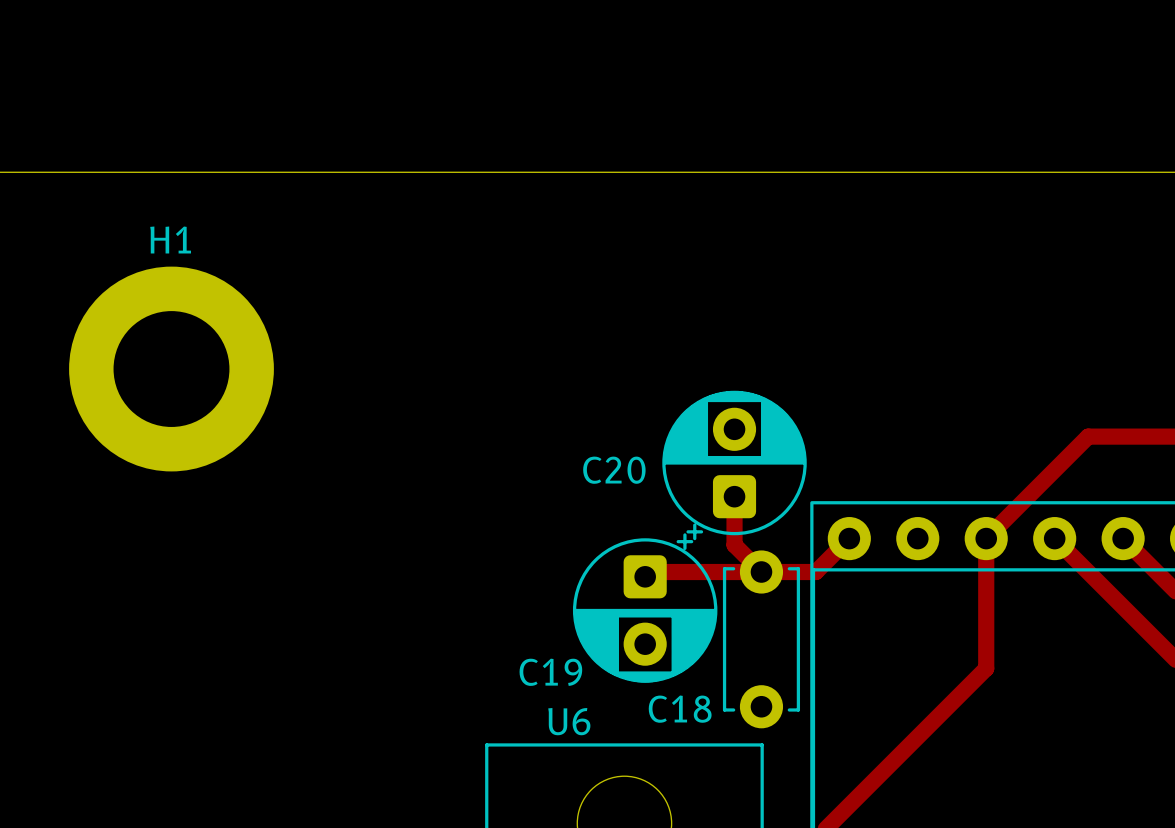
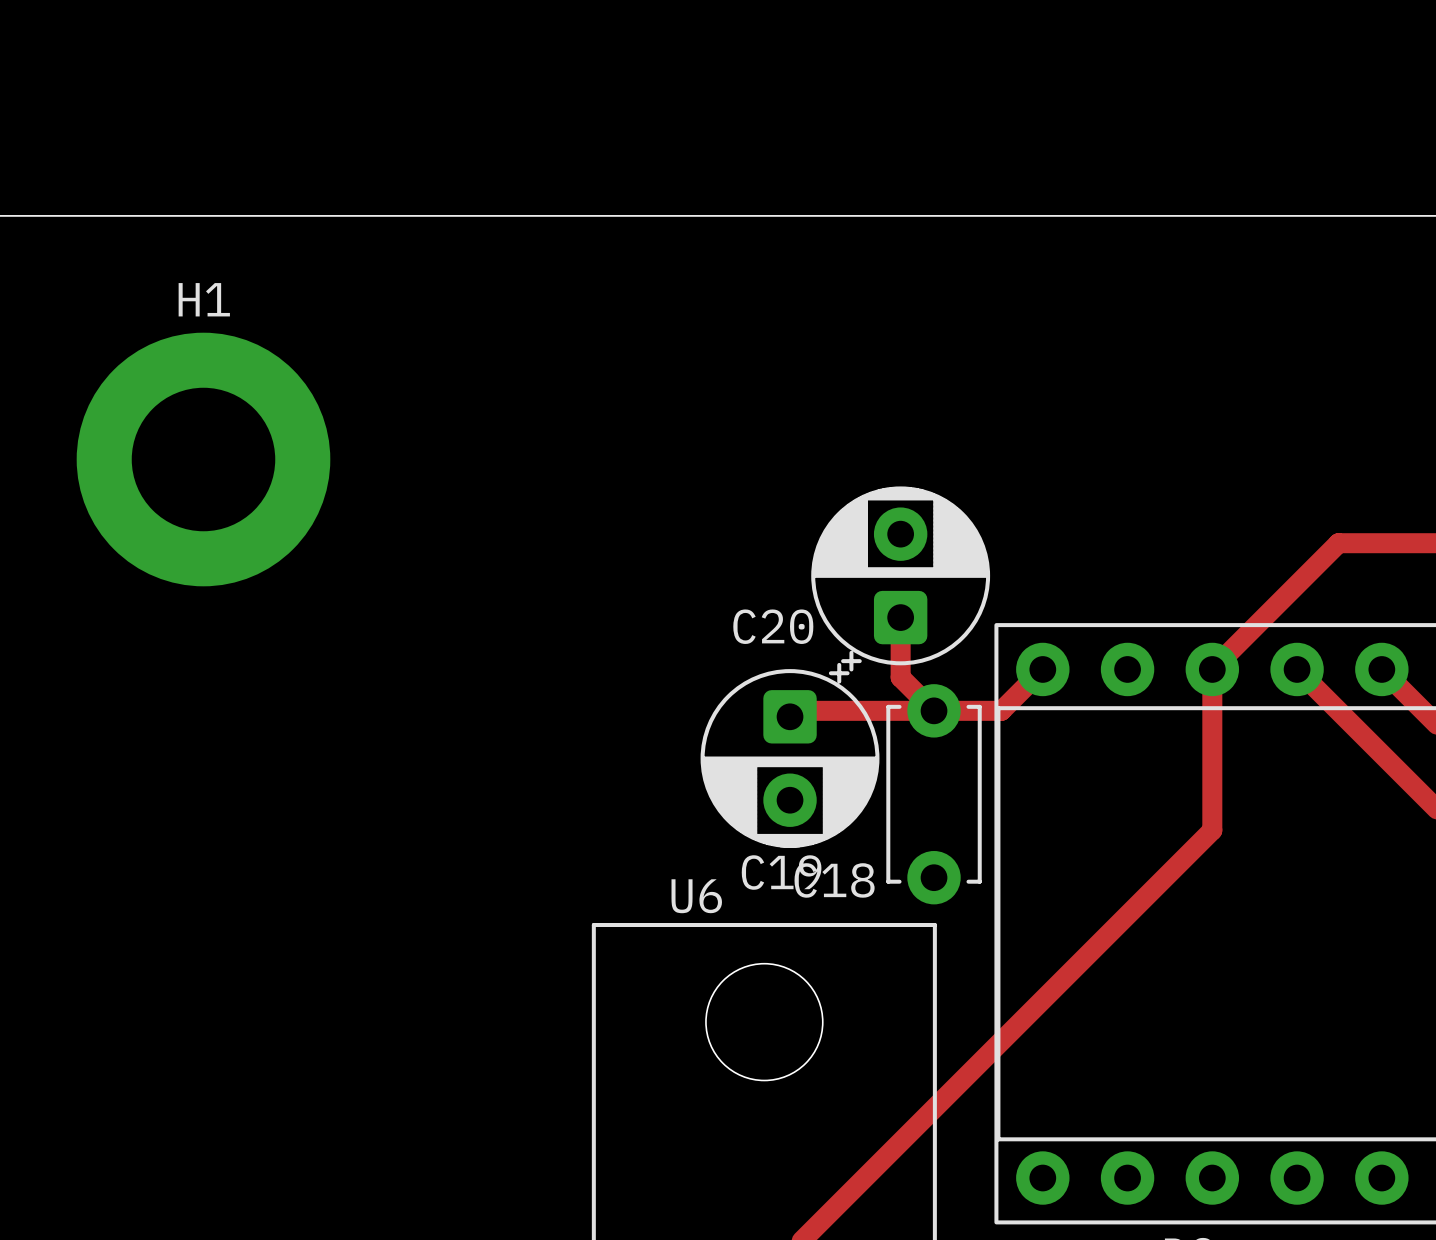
C20 name position: C20 (614, 470) -> C20 (773, 626)
C19 name position: C19 (550, 672) -> C19 (781, 872)

